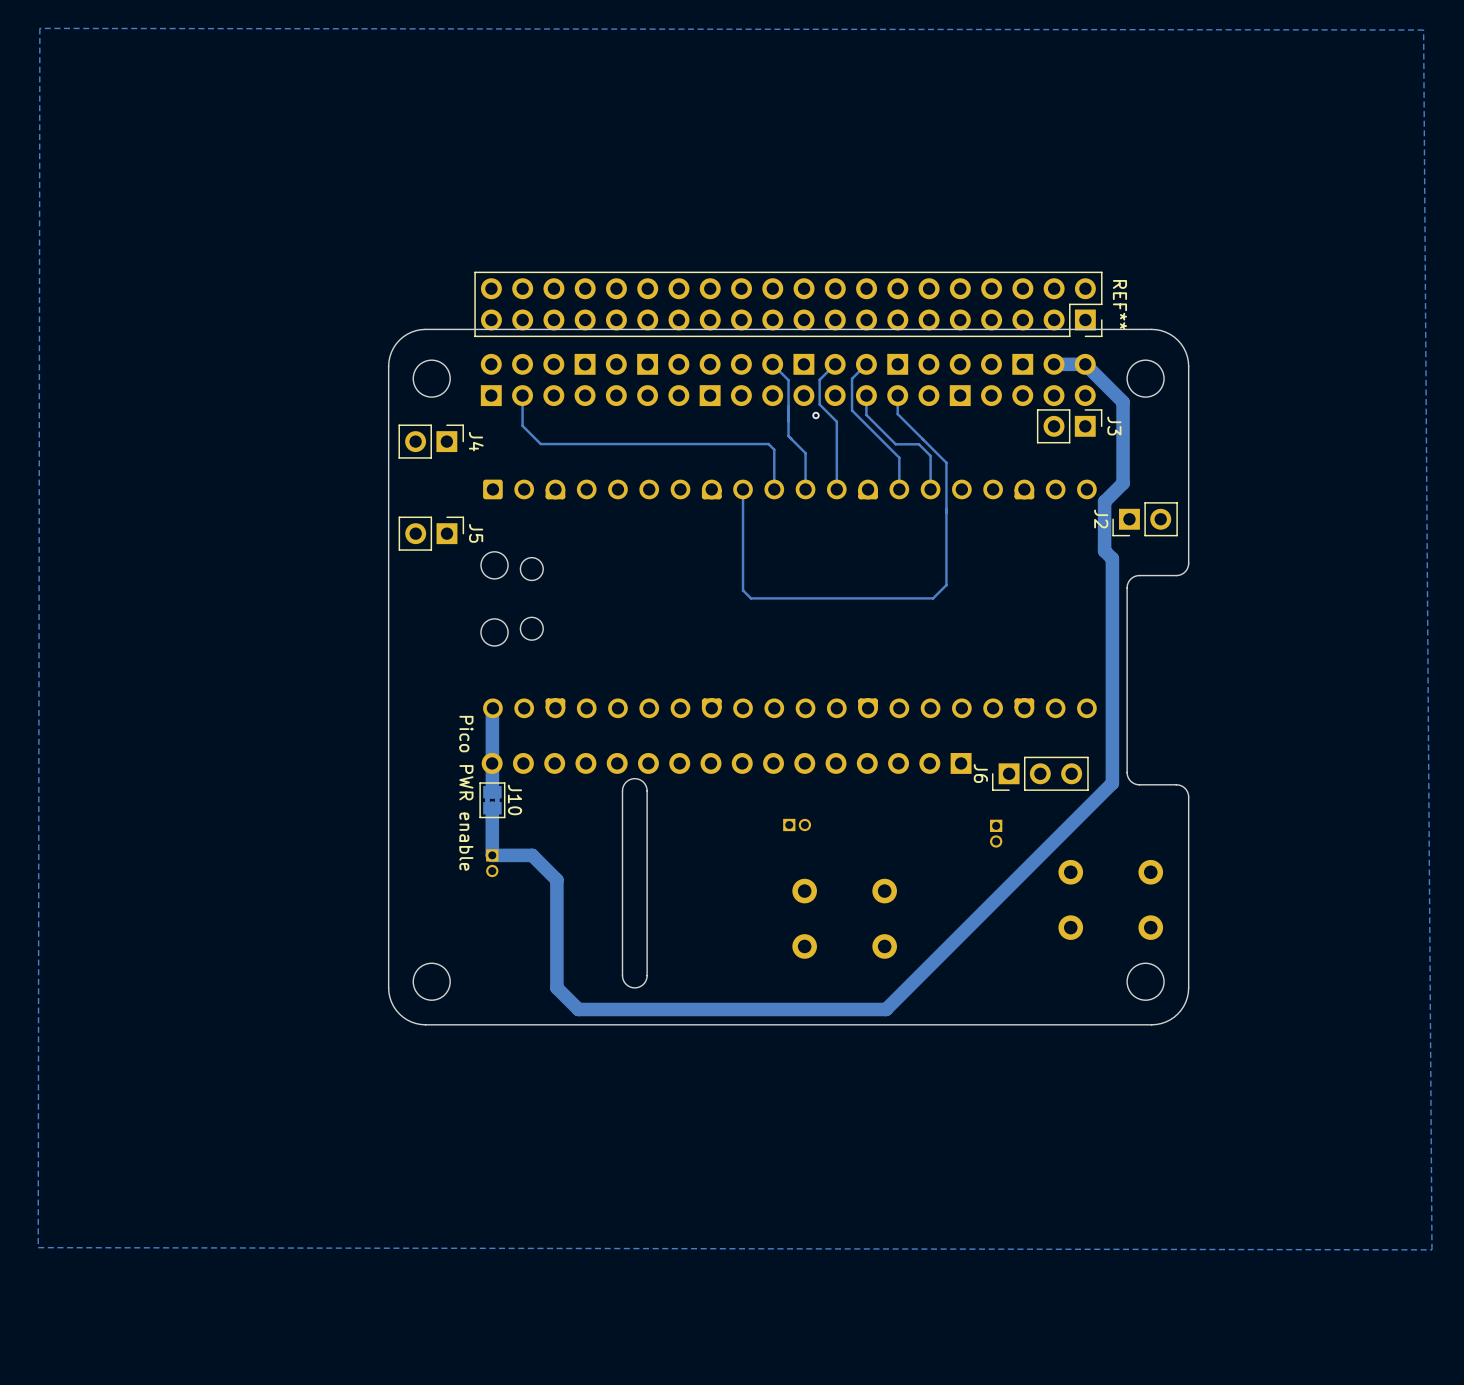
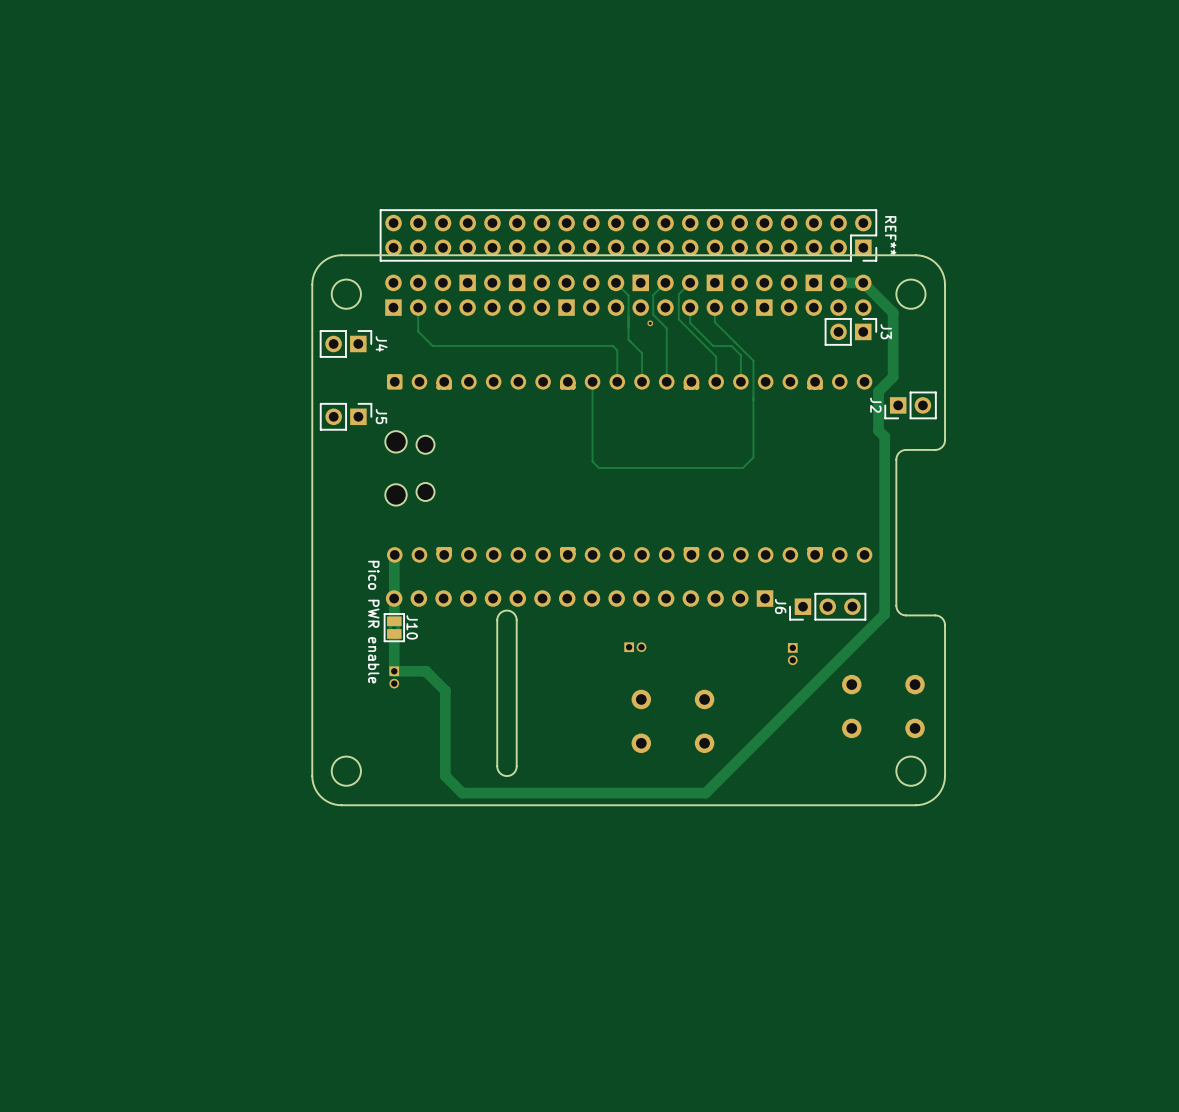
zone outline: (39, 28) (1423, 30) (1431, 1249) (38, 1247) (39, 28) -> none

